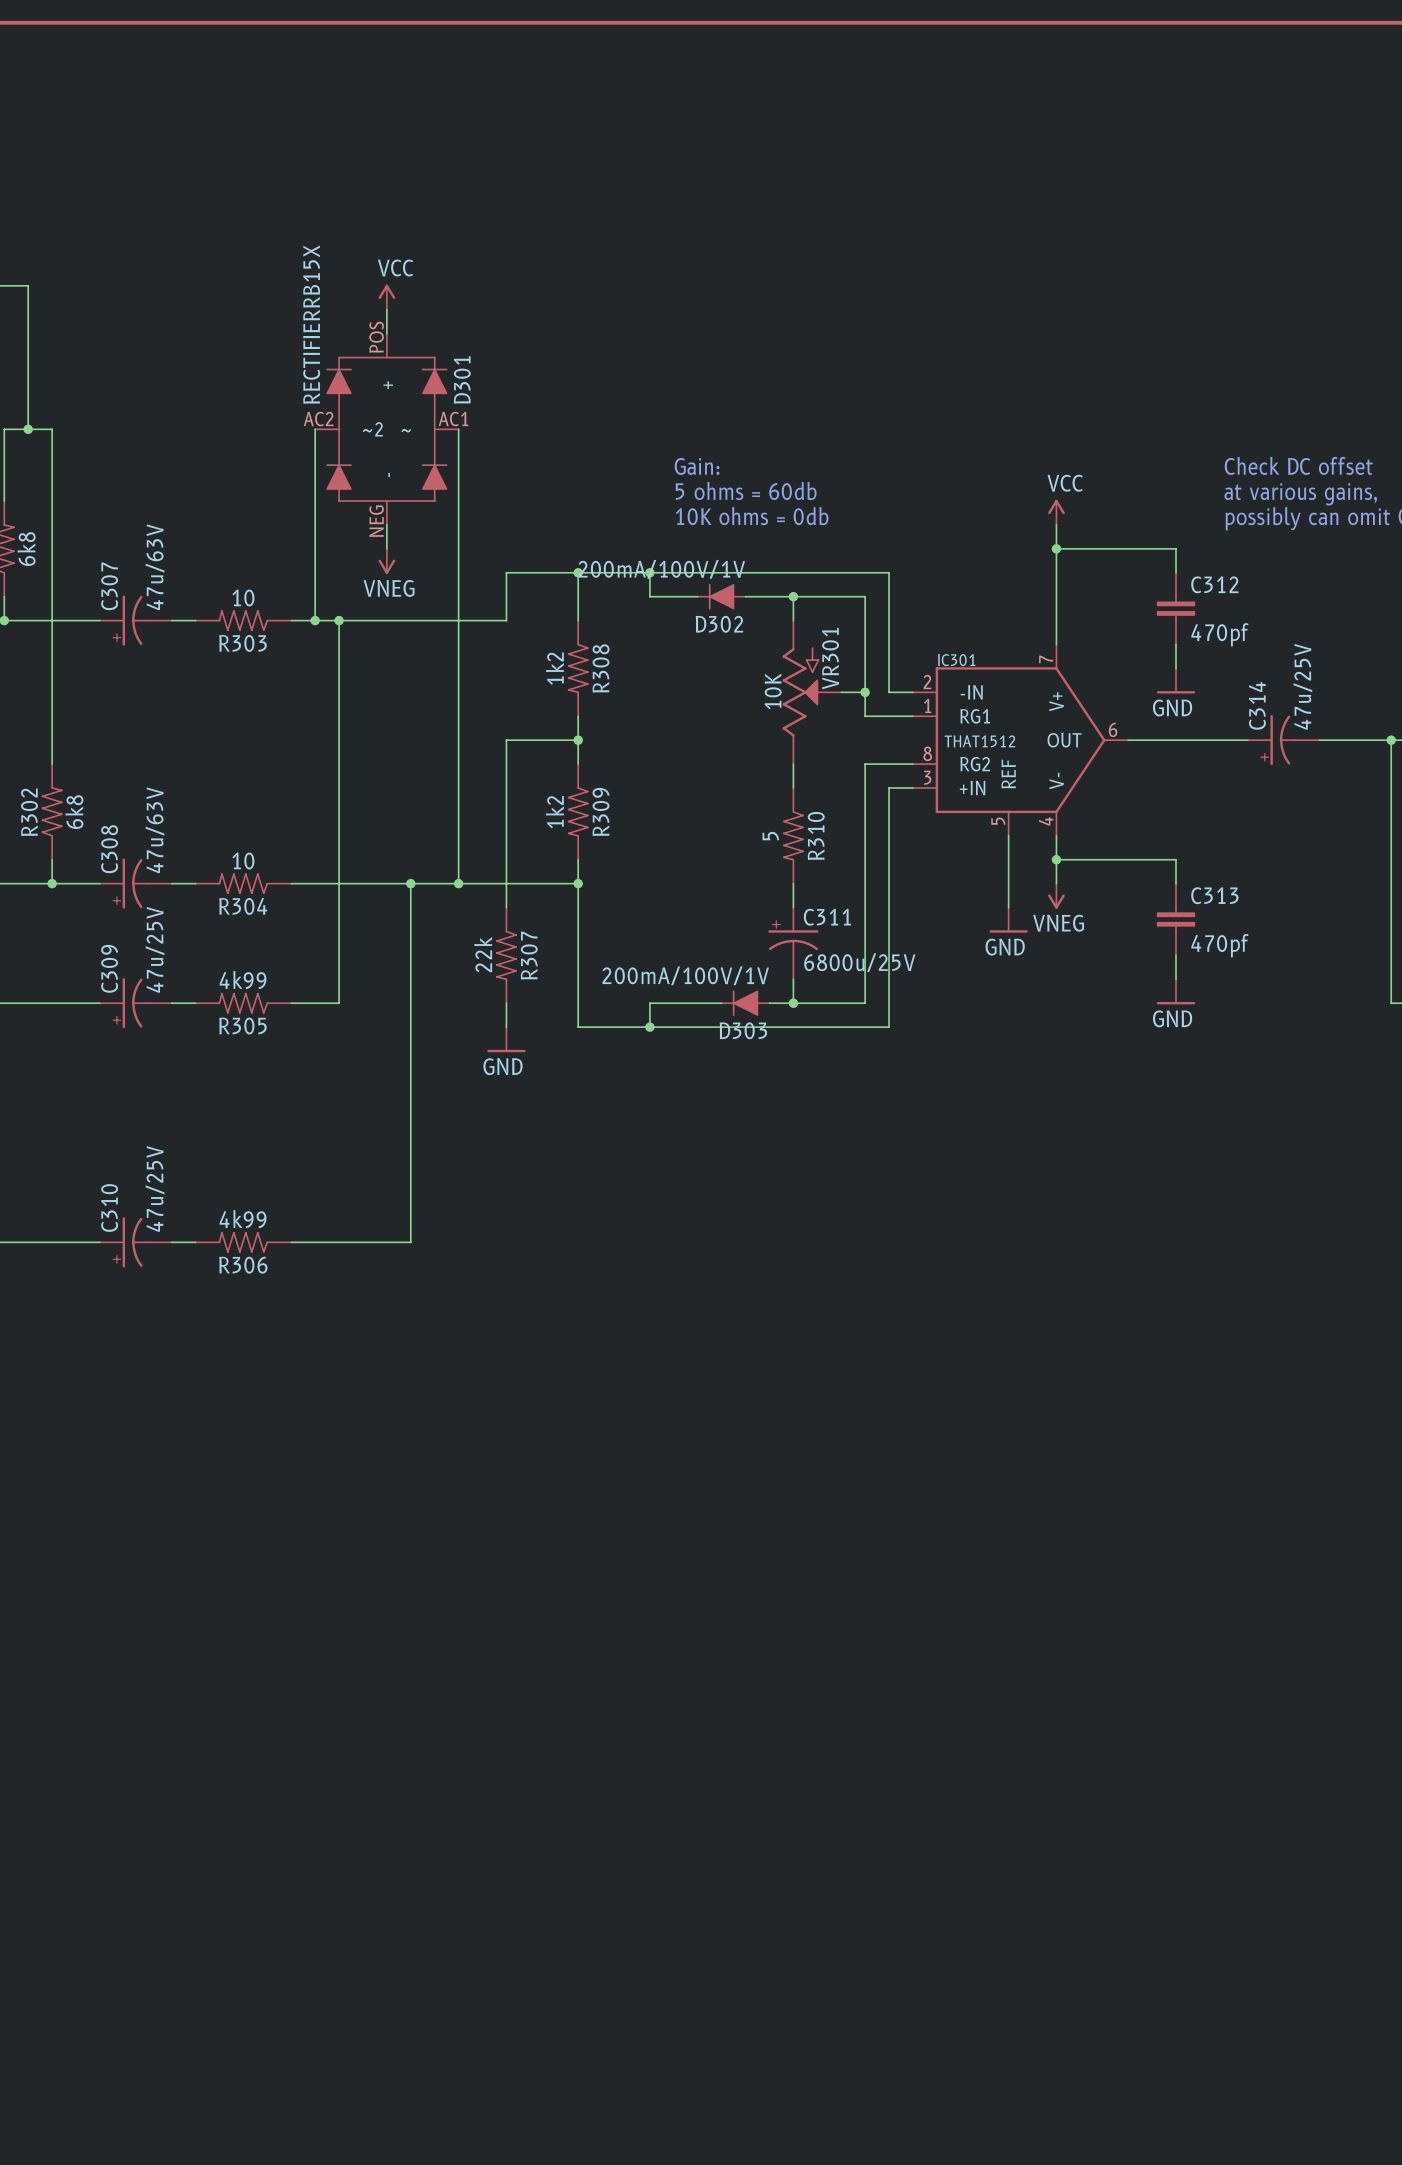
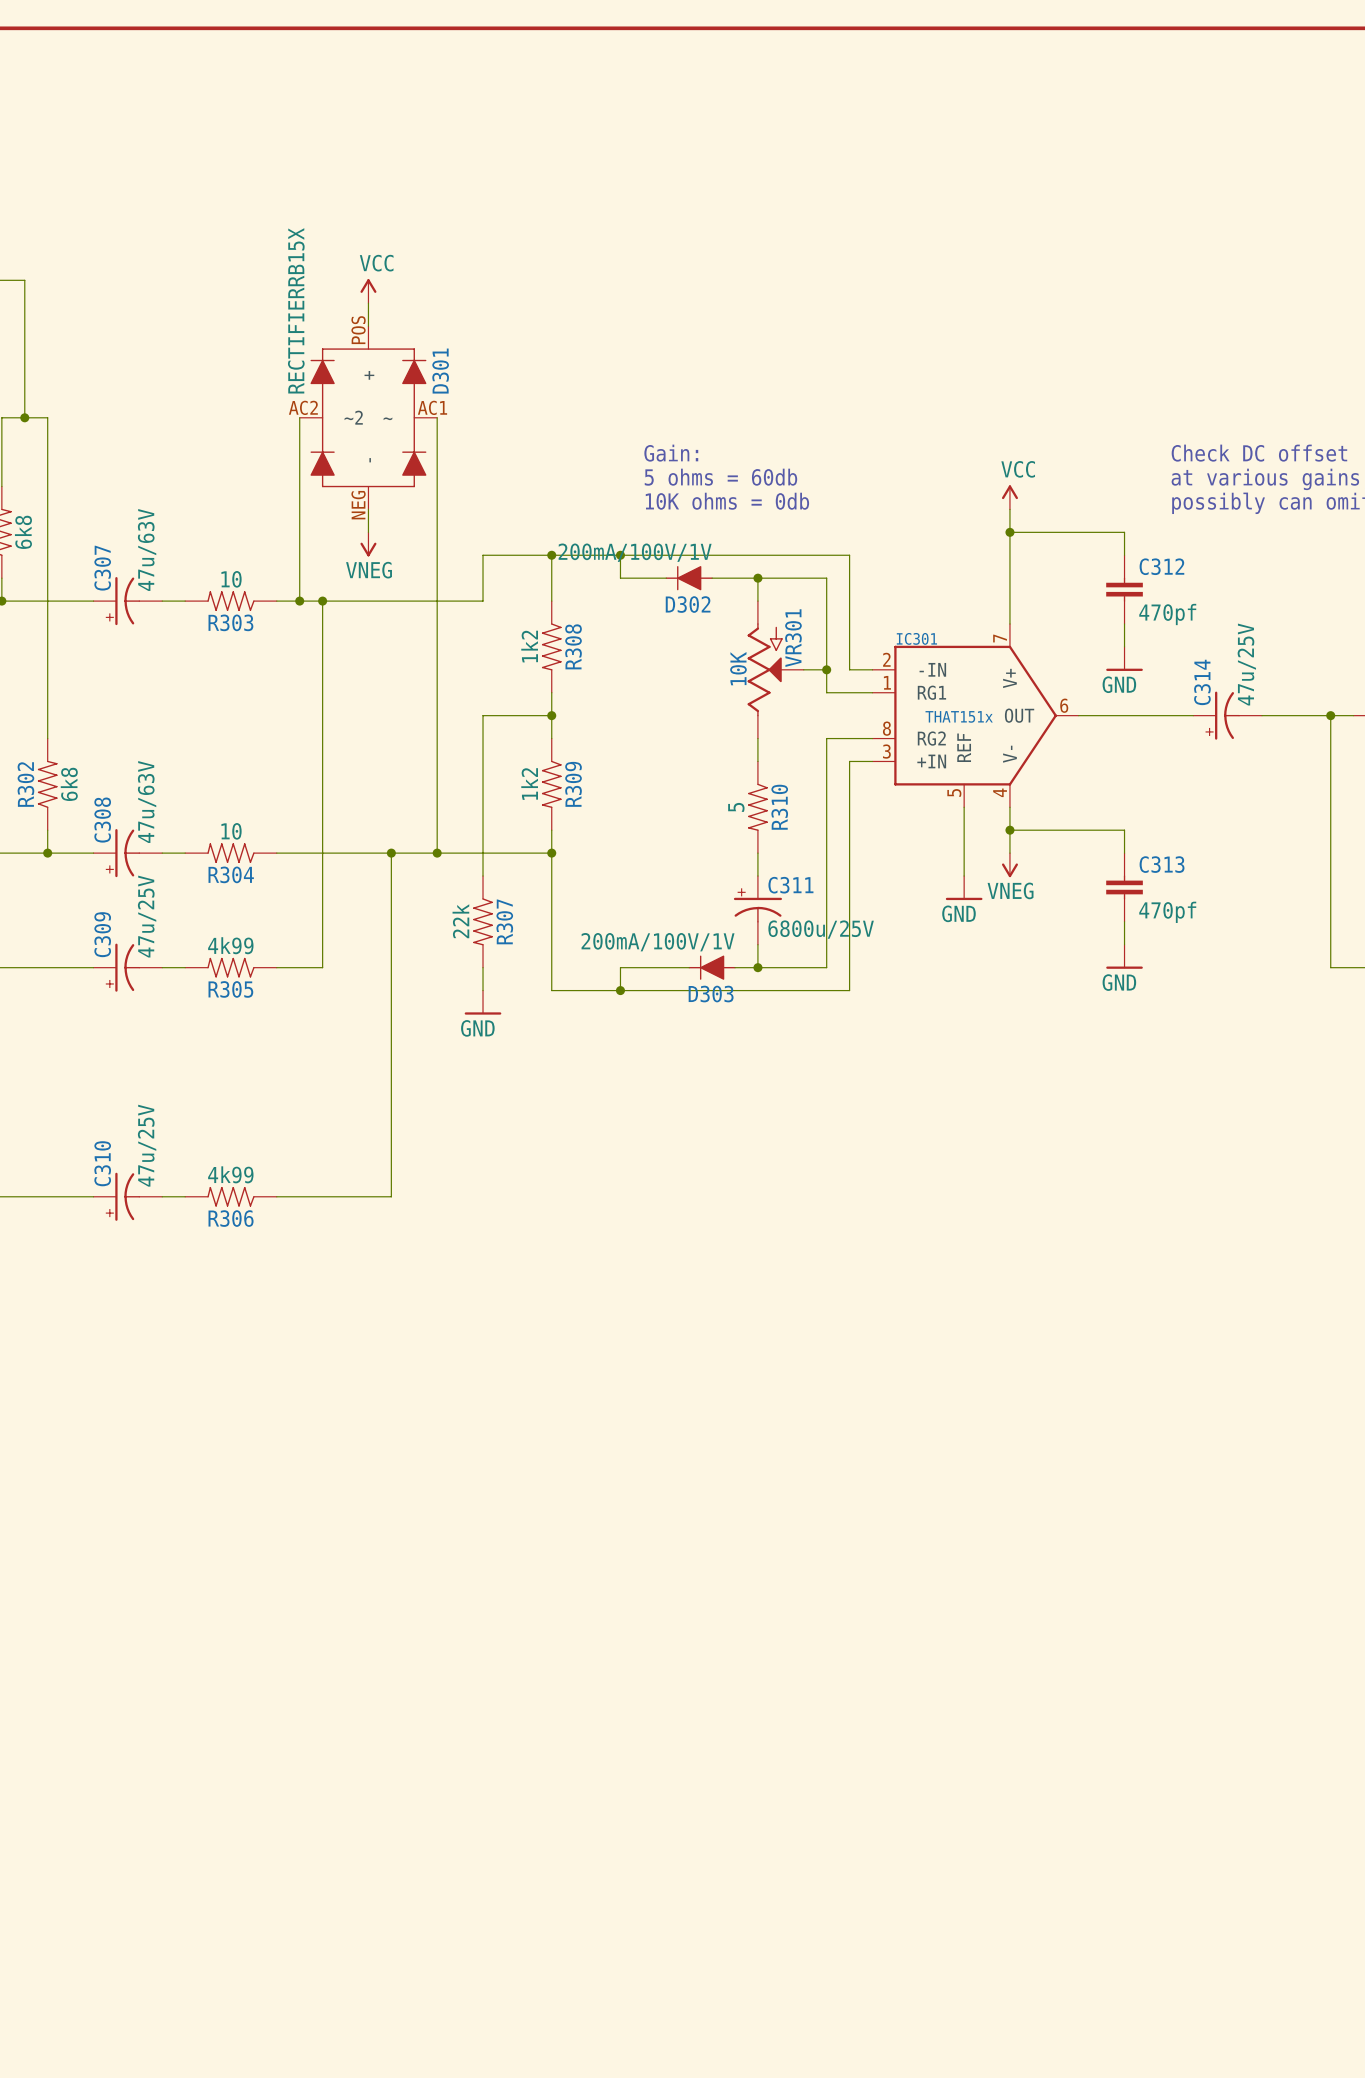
IC301 value: THAT1512 (979, 741) -> THAT151x (959, 716)

